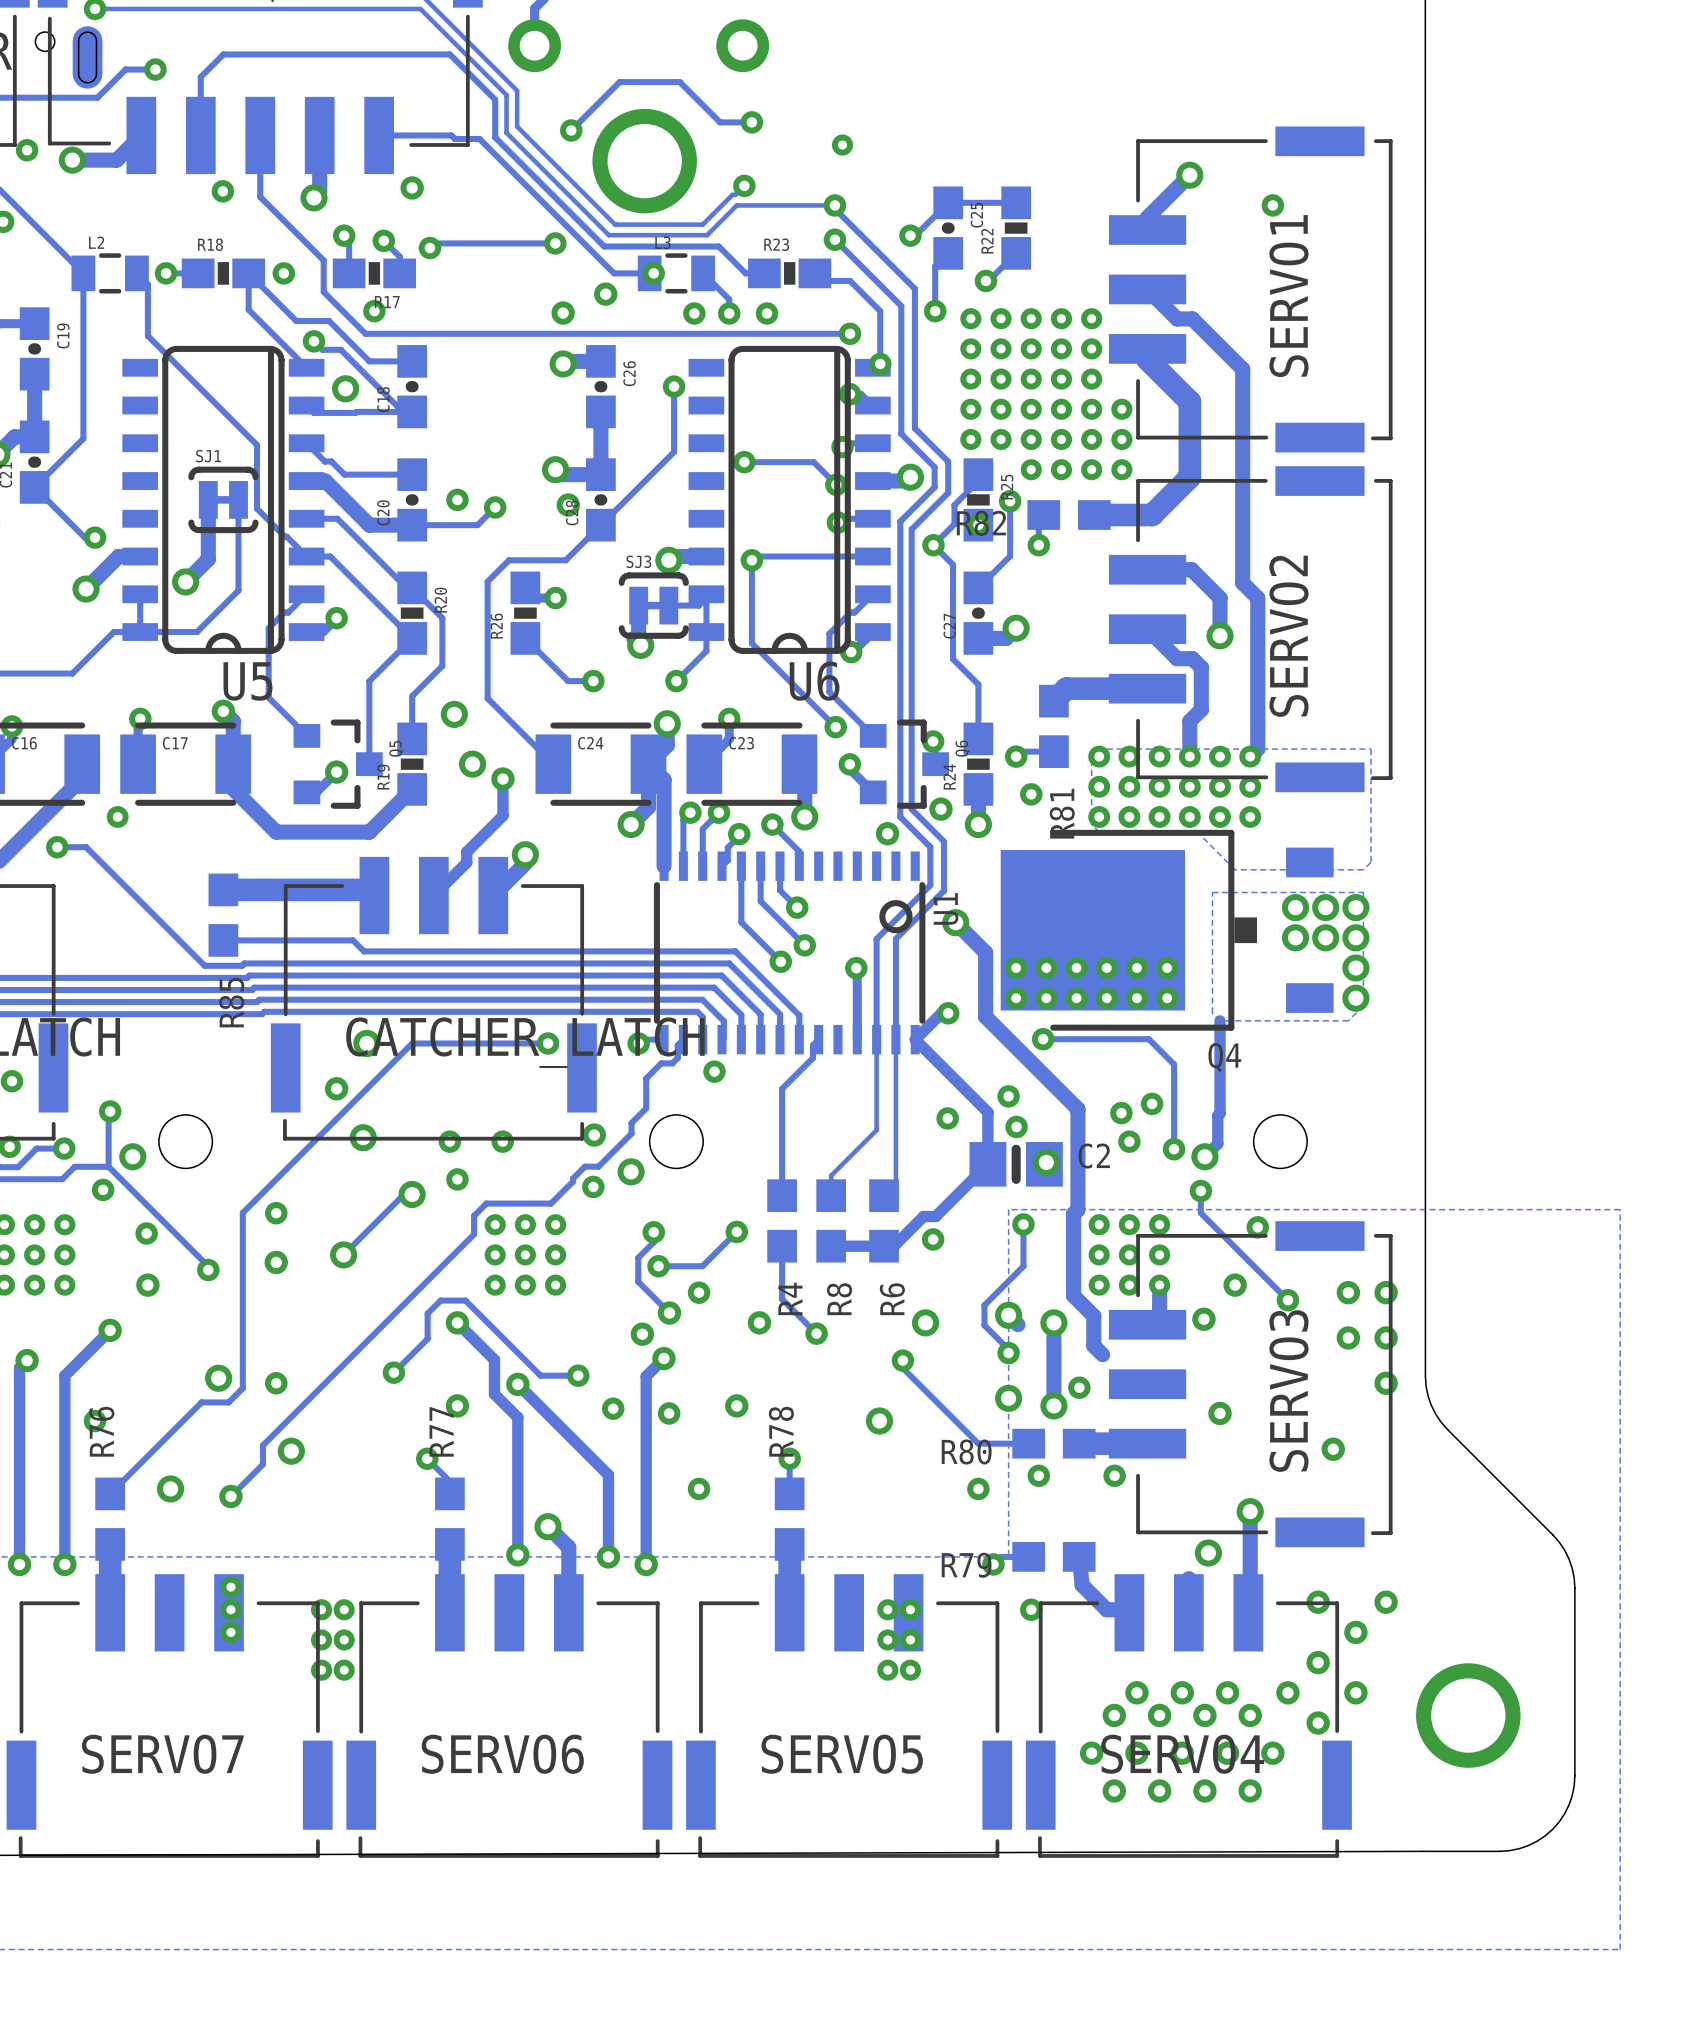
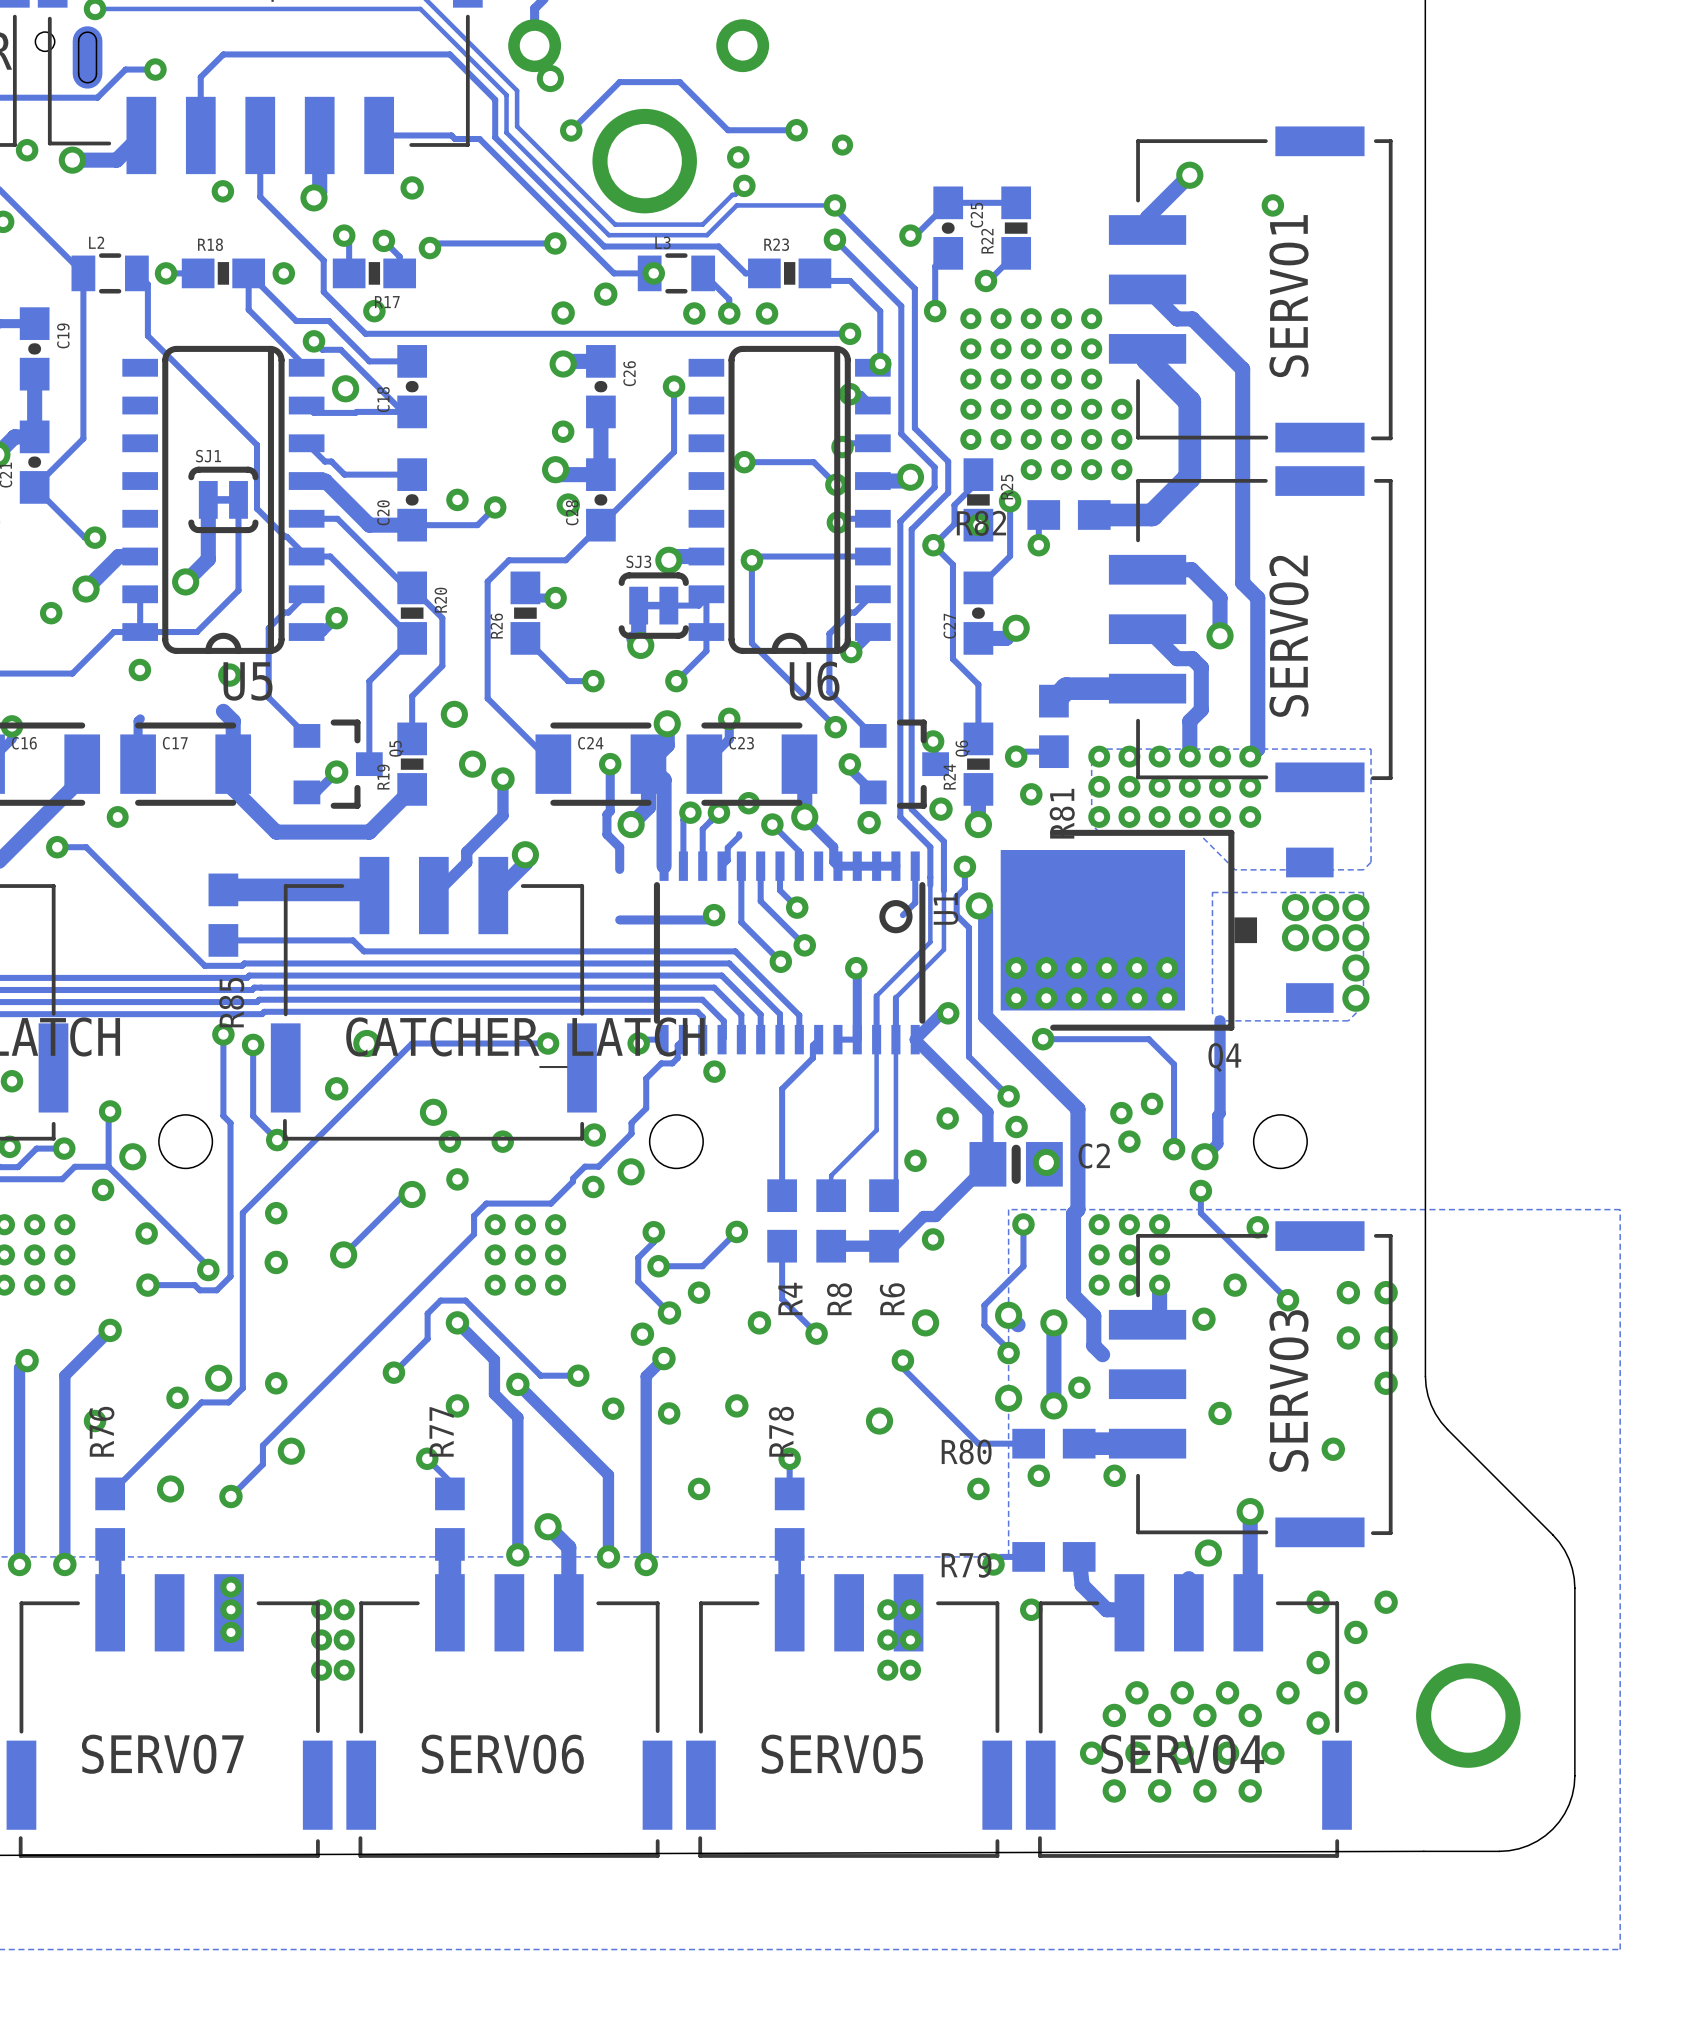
via: none -> (550, 78)
track: (751, 122) (720, 122) -> (796, 130) (727, 130) (720, 122)
via: (751, 122) -> none
via: none -> (796, 130)
via: none -> (738, 157)
via: none -> (563, 431)
via: none -> (51, 613)
via position: (223, 711) -> (229, 675)
via position: (140, 718) -> (139, 670)
track: none -> (610, 764) (610, 811) (606, 814) (606, 834) (619, 847) (619, 869)
via: none -> (610, 764)
track: none -> (804, 817) (833, 847) (833, 861) (837, 866) (895, 866)
via position: (887, 833) -> (869, 822)
via position: (739, 834) -> (748, 803)
track: none -> (915, 866) (915, 902) (902, 915)
track: none -> (964, 866) (964, 888) (956, 896) (956, 915) (968, 927) (968, 1056) (1008, 1096)
via: none -> (964, 866)
track: (930, 885) (876, 939) (876, 995) -> (930, 877) (930, 942) (876, 995)
track: (943, 890) (895, 938) (895, 997) -> (943, 877) (943, 949) (895, 997)
track: none -> (714, 915) (709, 919) (619, 919)
via: none -> (714, 915)
track: (955, 922) (985, 952) -> (979, 905) (985, 912) (985, 952)
via position: (955, 922) -> (979, 905)
track: none -> (223, 1034) (223, 1115) (230, 1123) (230, 1276) (216, 1290) (199, 1290) (194, 1285) (147, 1285)
via: none -> (223, 1034)
track: none -> (857, 1039) (837, 1039)
track: none -> (253, 1044) (253, 1115) (277, 1140)
via: none -> (253, 1044)
via position: (363, 1137) -> (433, 1112)
via: none -> (277, 1140)
via: none -> (915, 1160)
via: none -> (177, 1397)

